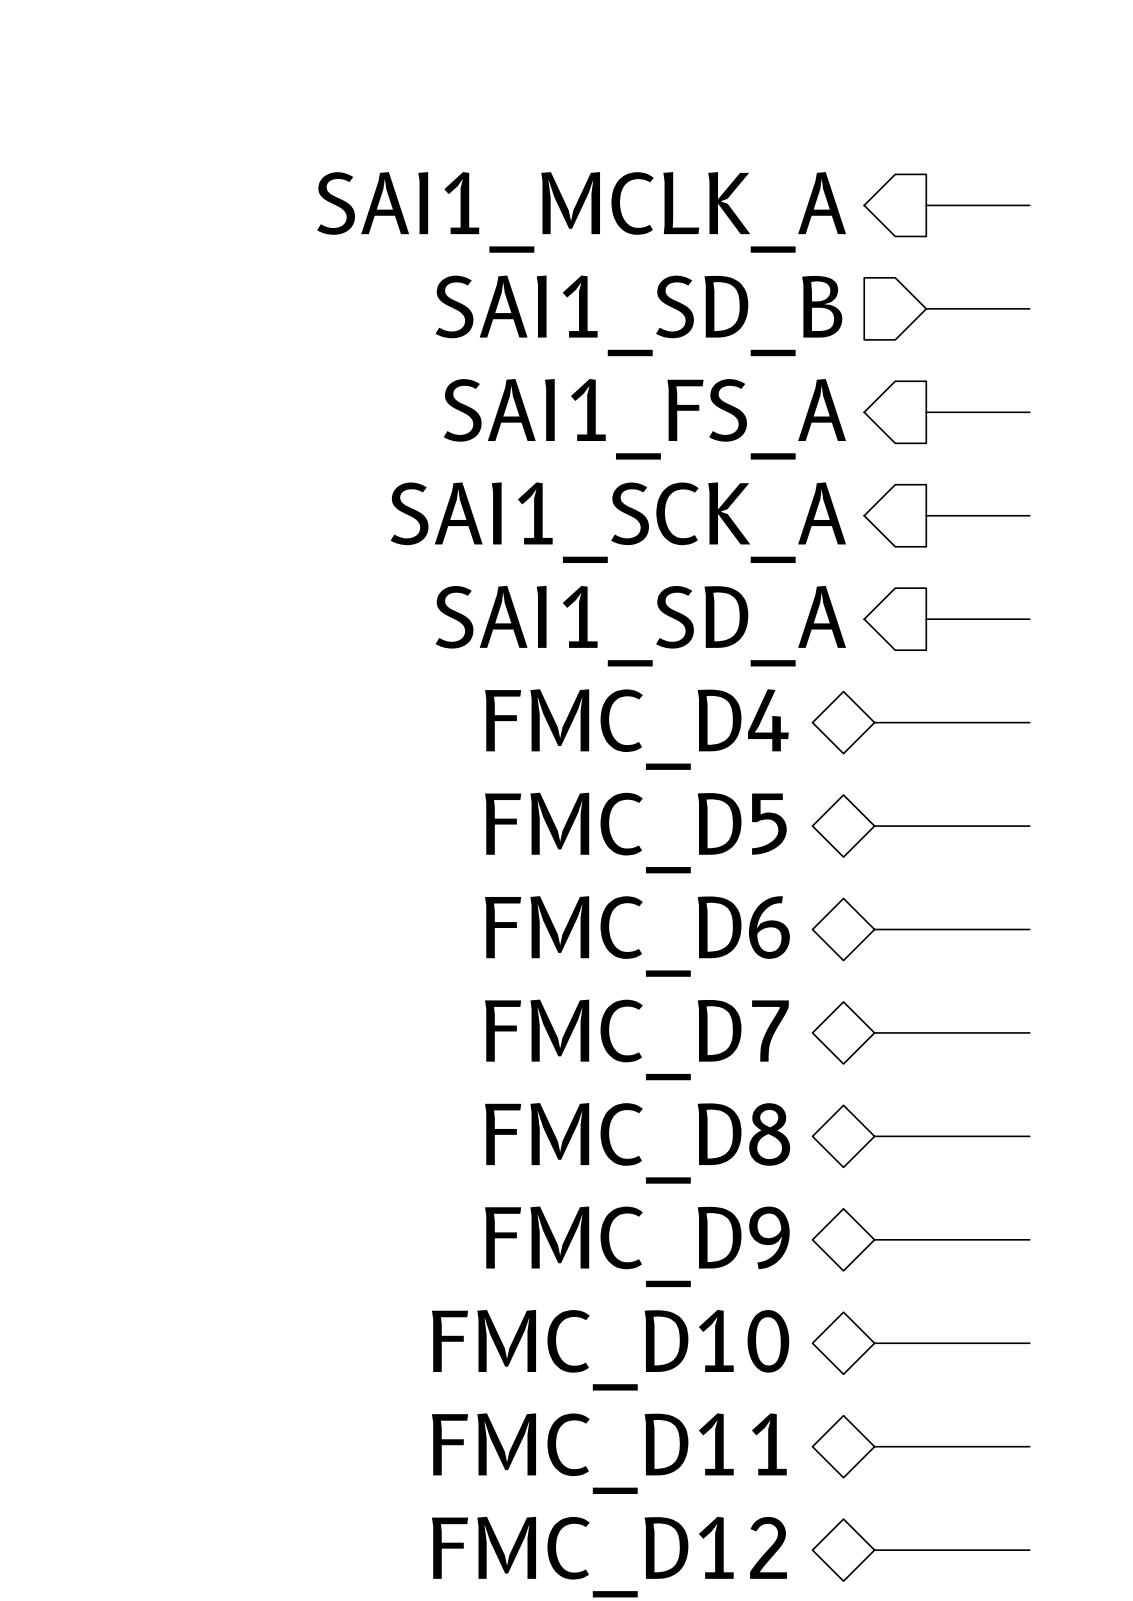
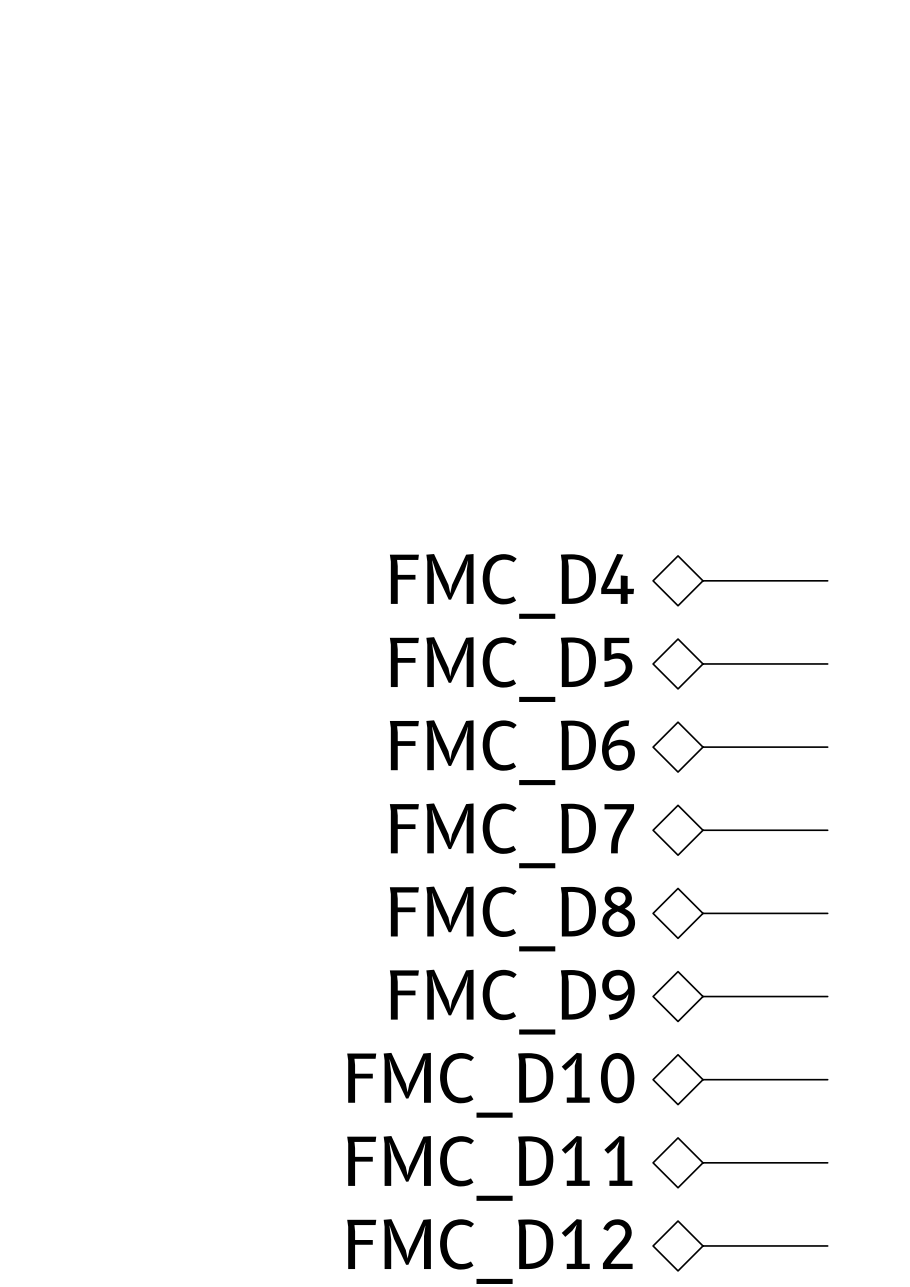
wire: (926, 205) (1029, 205) -> none
hierarchical label: SAI1_MCLK_A (581, 212) -> none
wire: (926, 308) (1029, 308) -> none
hierarchical label: SAI1_SD_B (638, 315) -> none
wire: (926, 412) (1029, 412) -> none
hierarchical label: SAI1_FS_A (644, 419) -> none
wire: (926, 515) (1029, 515) -> none
hierarchical label: SAI1_SCK_A (618, 522) -> none
wire: (926, 619) (1029, 619) -> none
hierarchical label: SAI1_SD_A (640, 626) -> none

